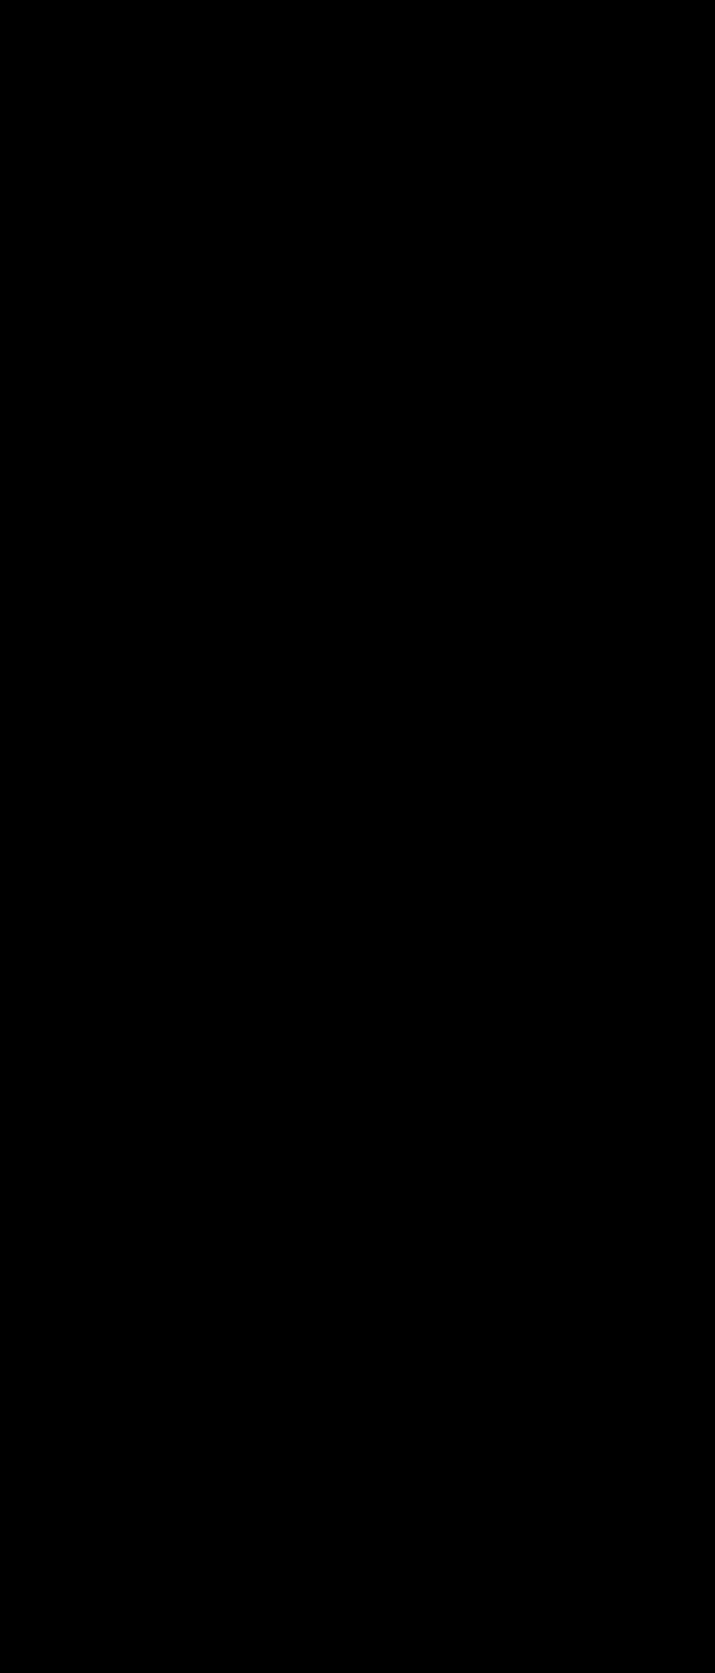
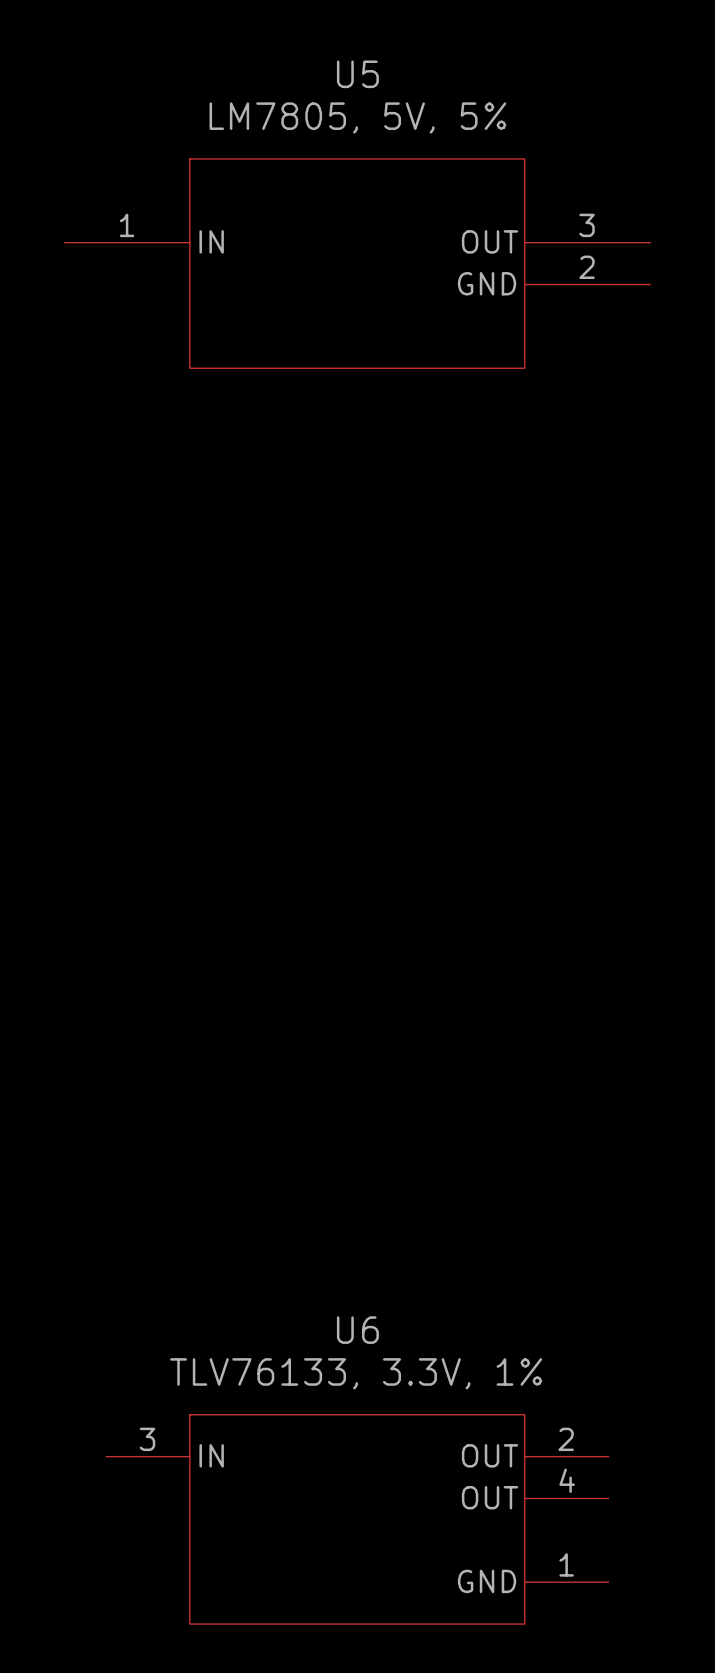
U5: none -> LM7805, 5V, 5% (357, 263)
U6: none -> TLV76133, 3.3V, 1% (357, 1519)

